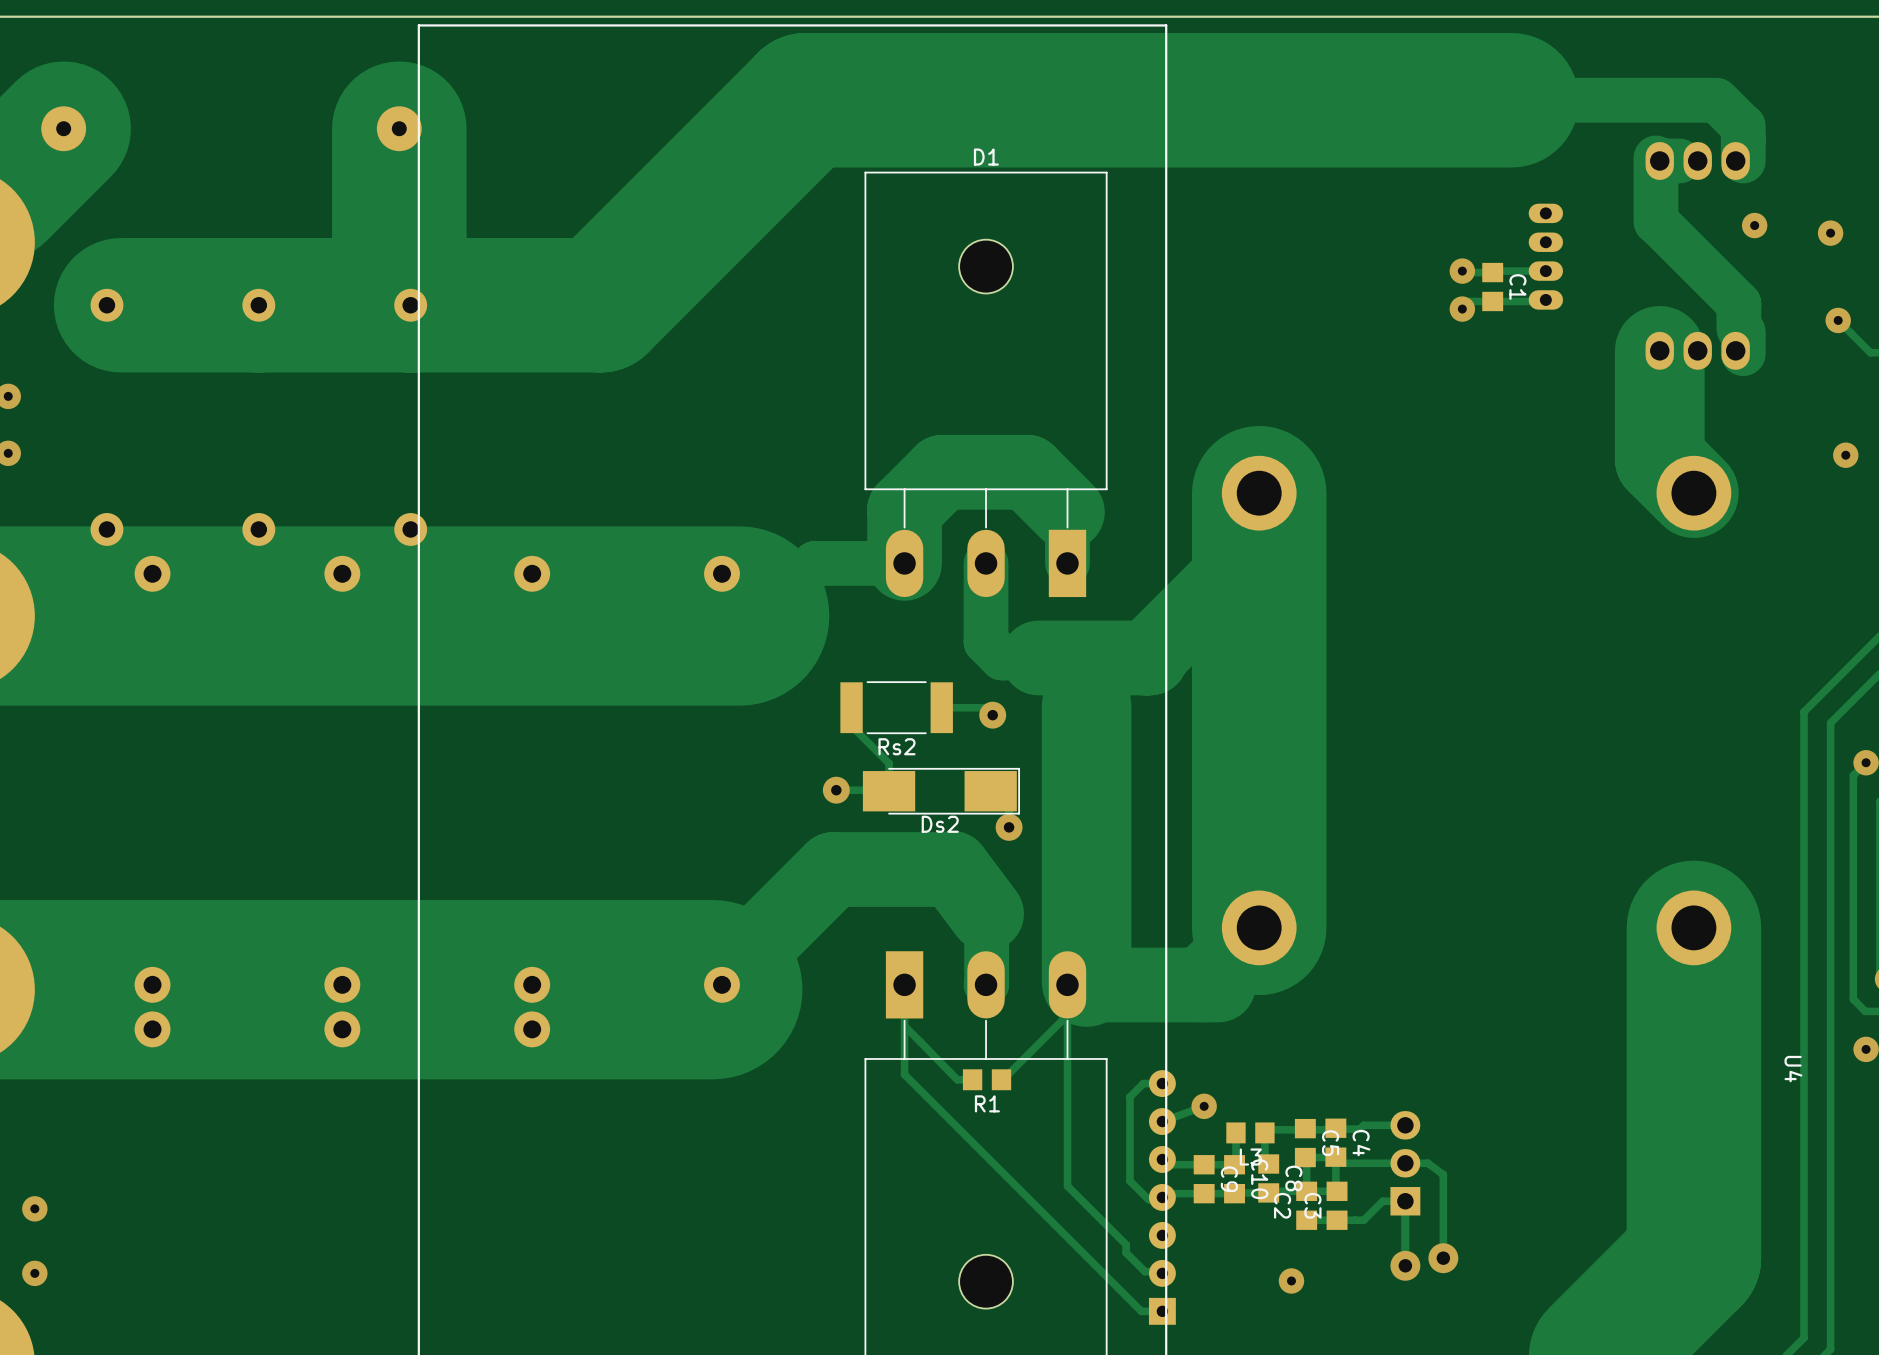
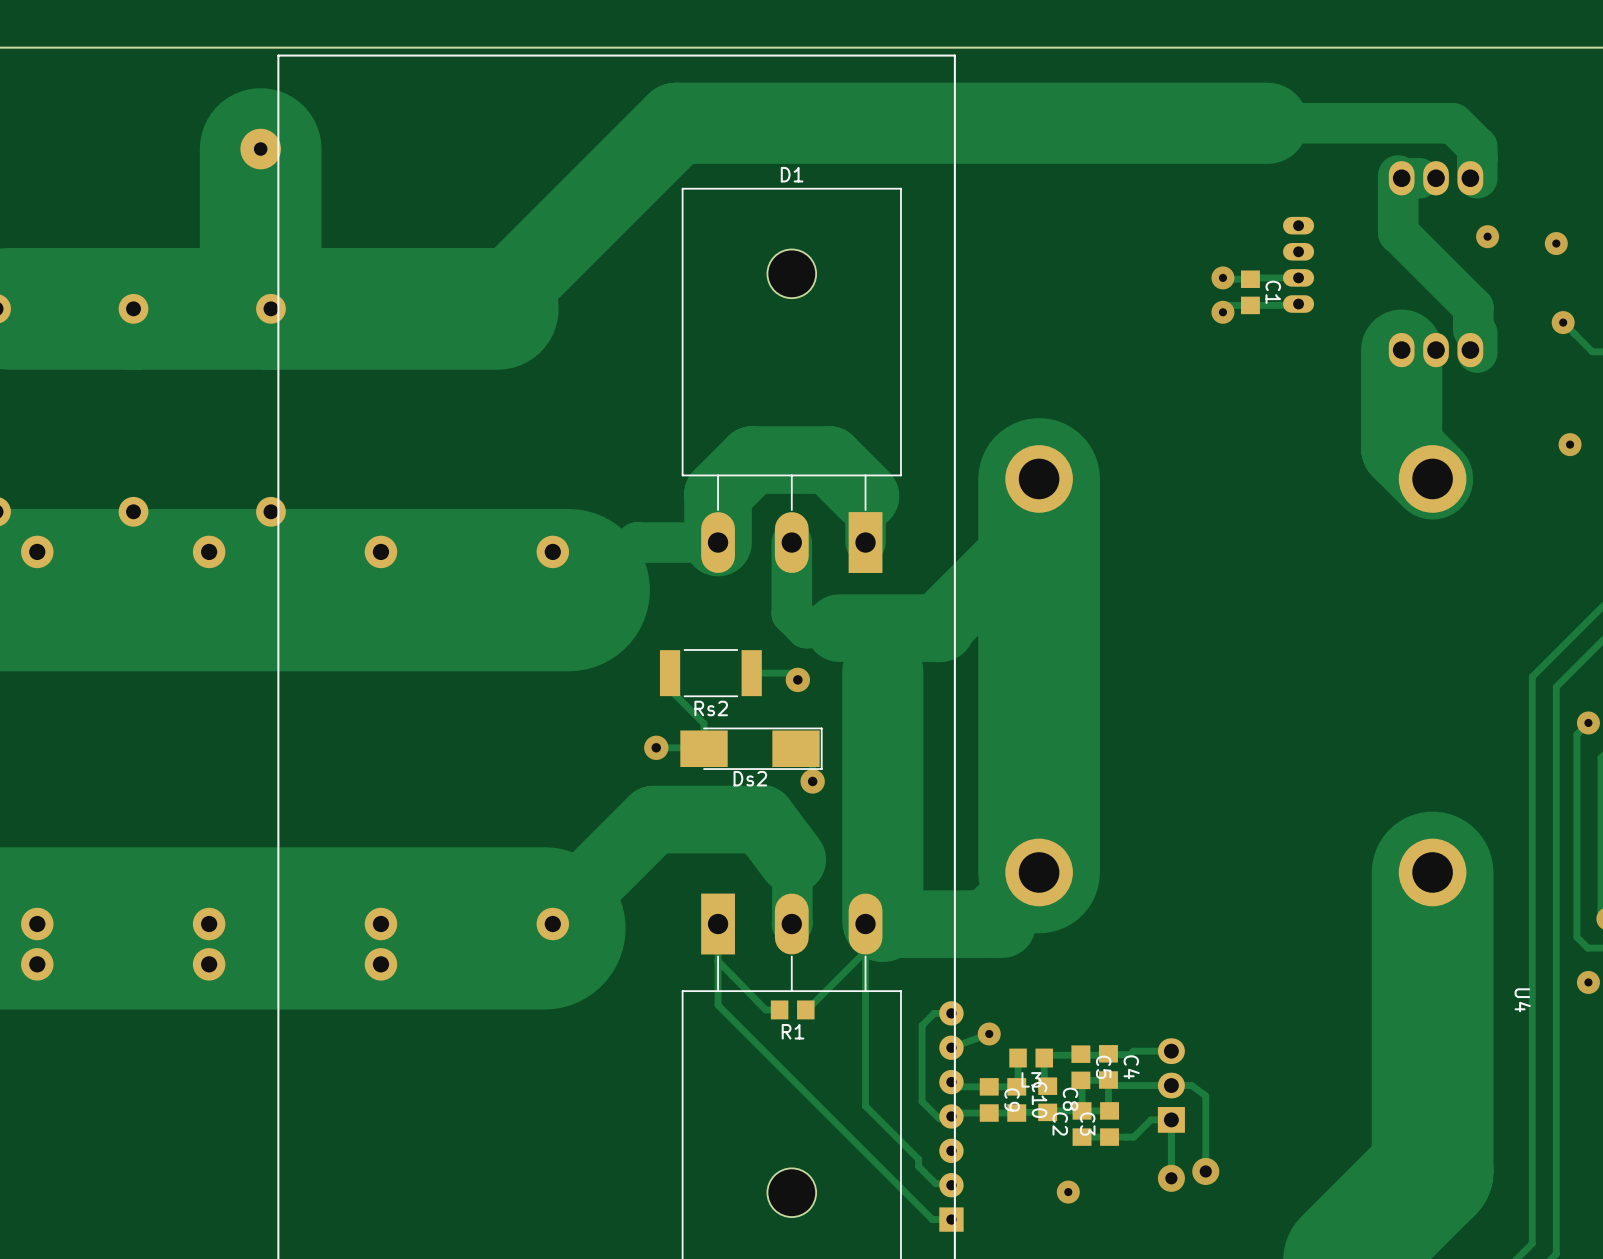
track: (858, 100) (805, 100) (600, 305) -> (676, 123) (497, 301) (497, 308) (442, 308)
track width: thick (1511, 100) (858, 100) -> thin (1267, 123) (676, 123)

